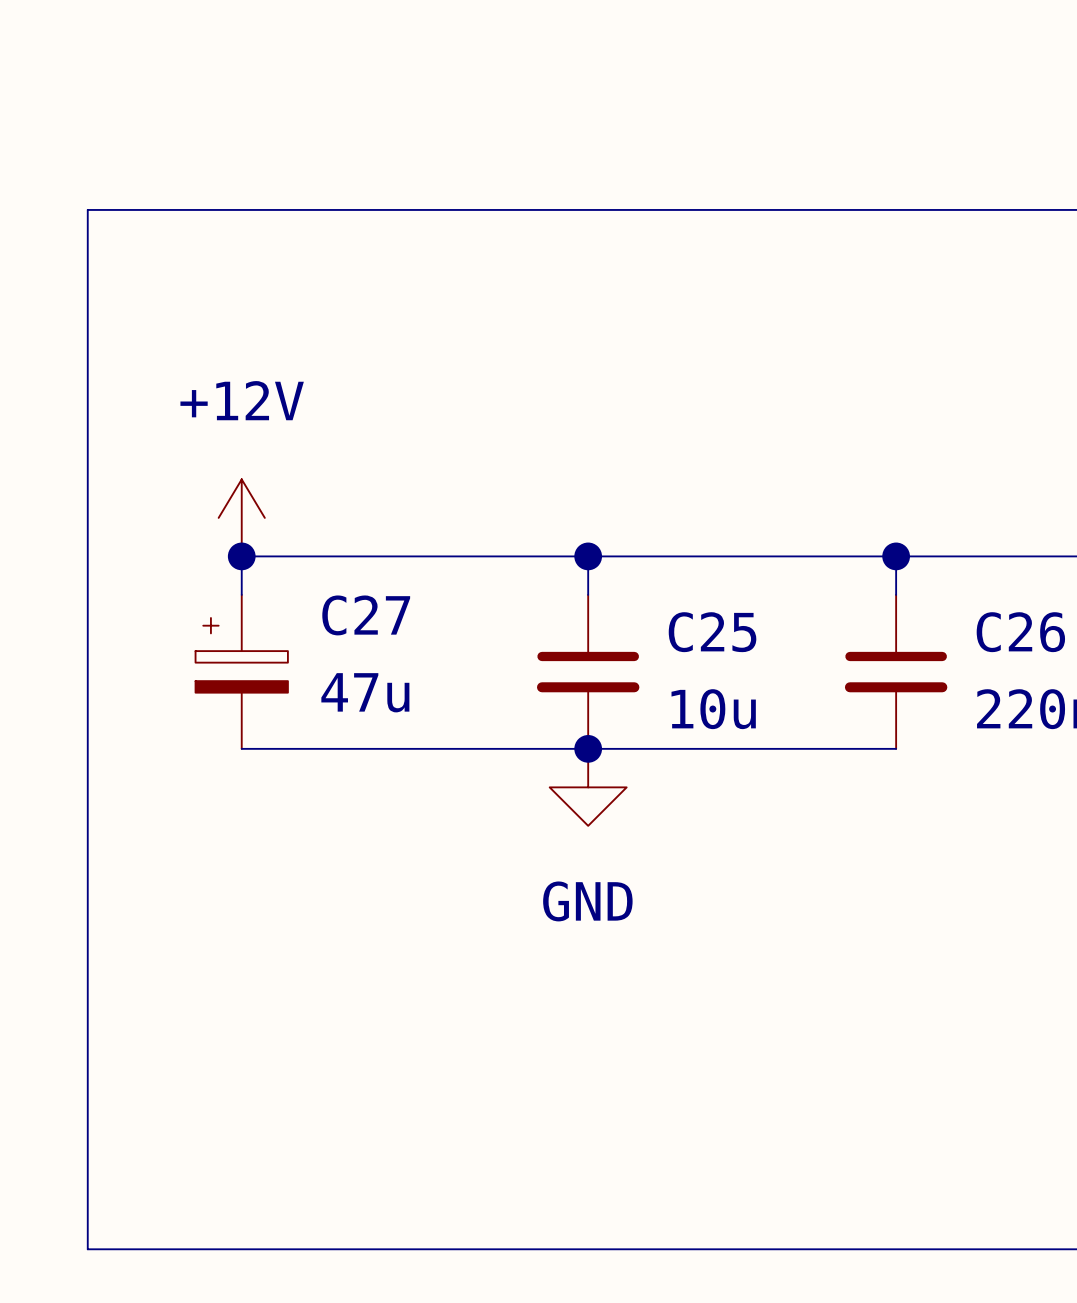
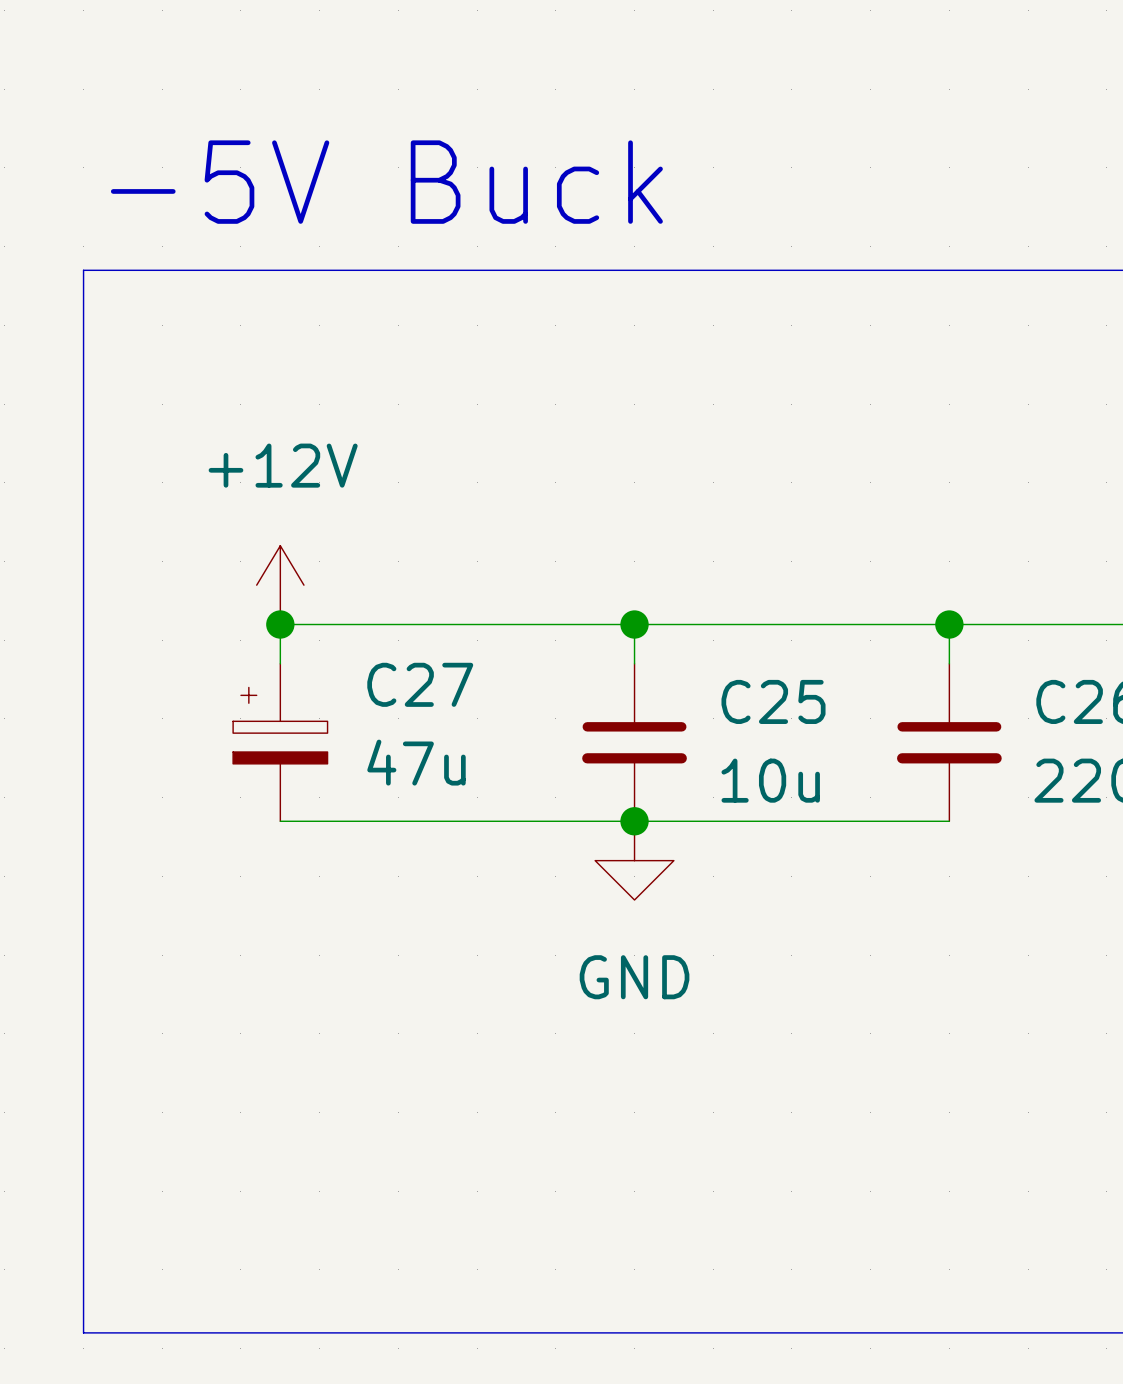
text: none -> -5V Buck (386, 182)
line: (87, 209) (87, 1249) -> (122, 270) (83, 270) (83, 1332) (122, 1332)

